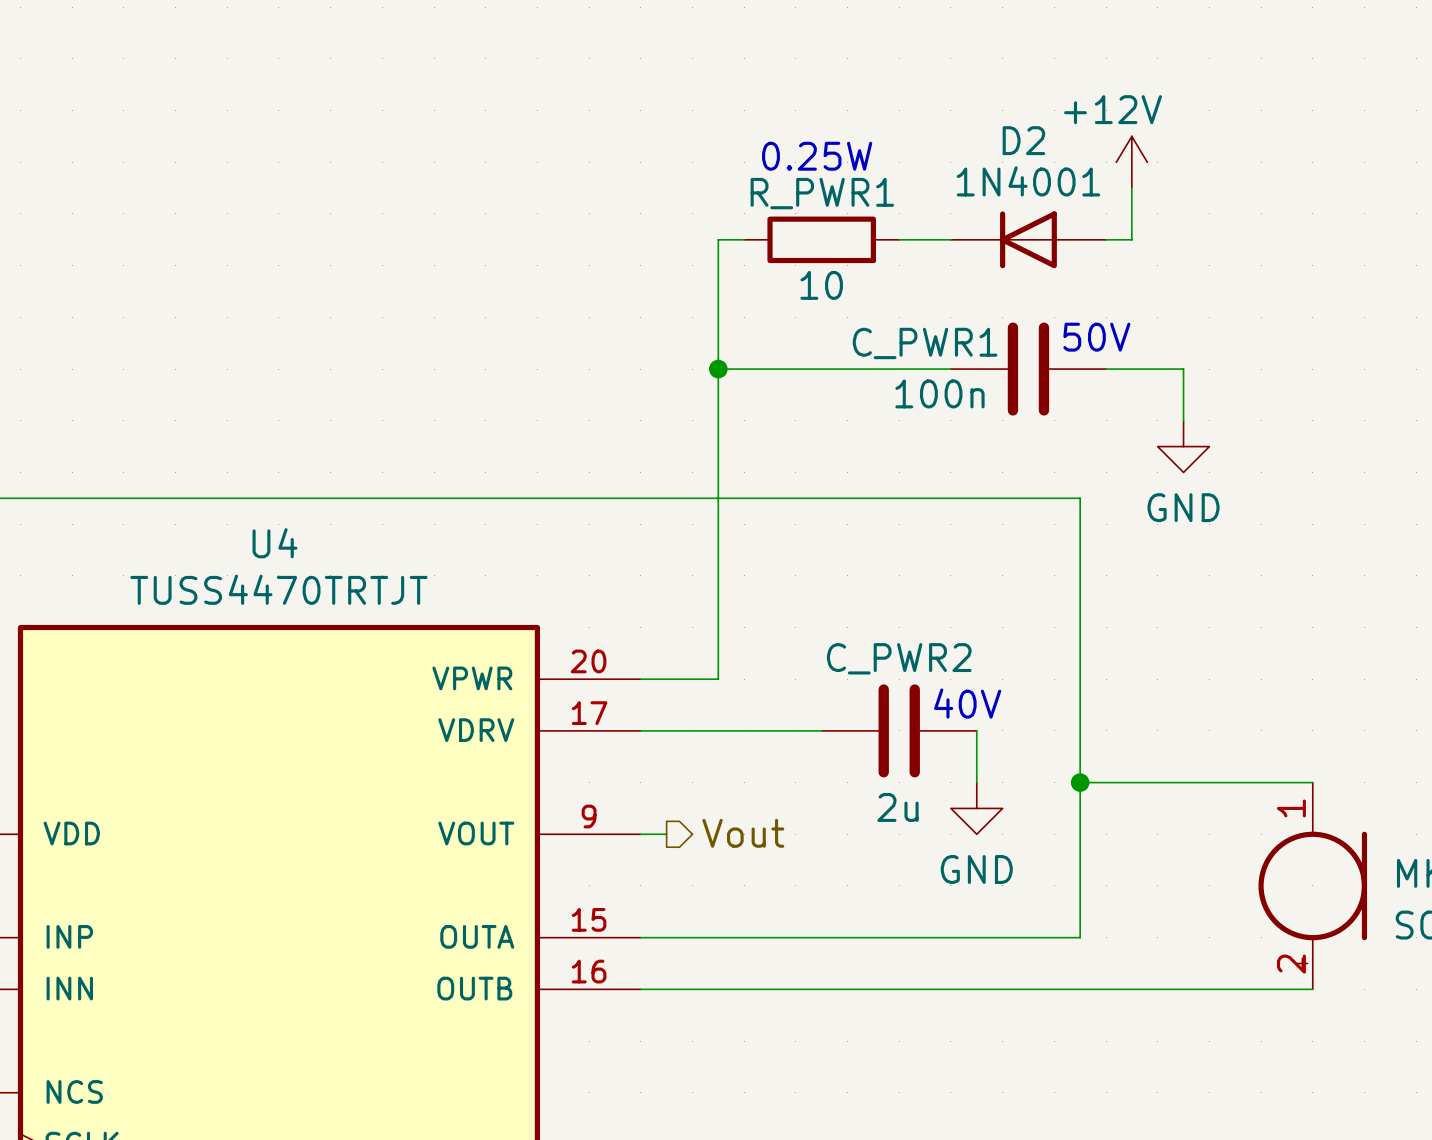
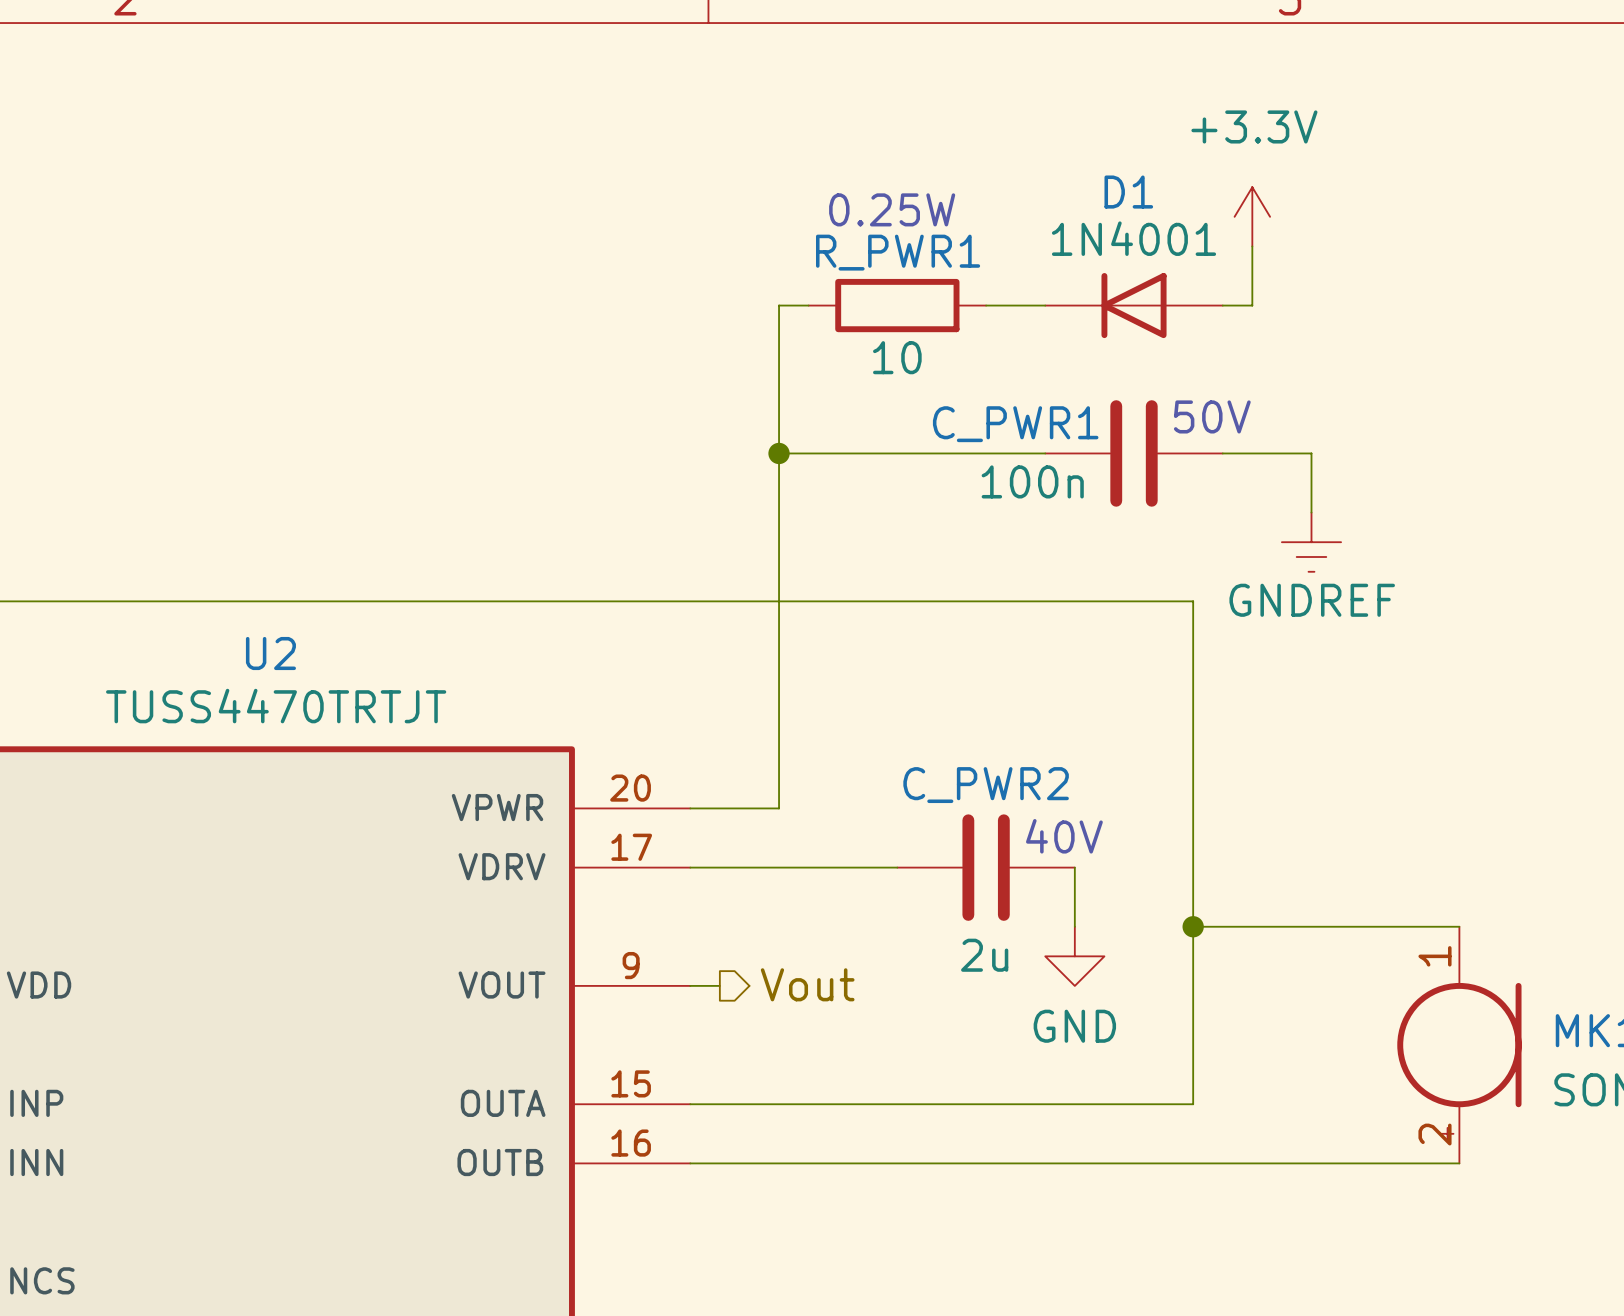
D2 name: D2 (1023, 140) -> D1 (1128, 192)
power symbol: +12V (1131, 162) -> +3.3V (1252, 216)
power symbol: GND (1183, 446) -> GNDREF (1311, 542)
U4 name: U4 (275, 543) -> U2 (270, 653)

